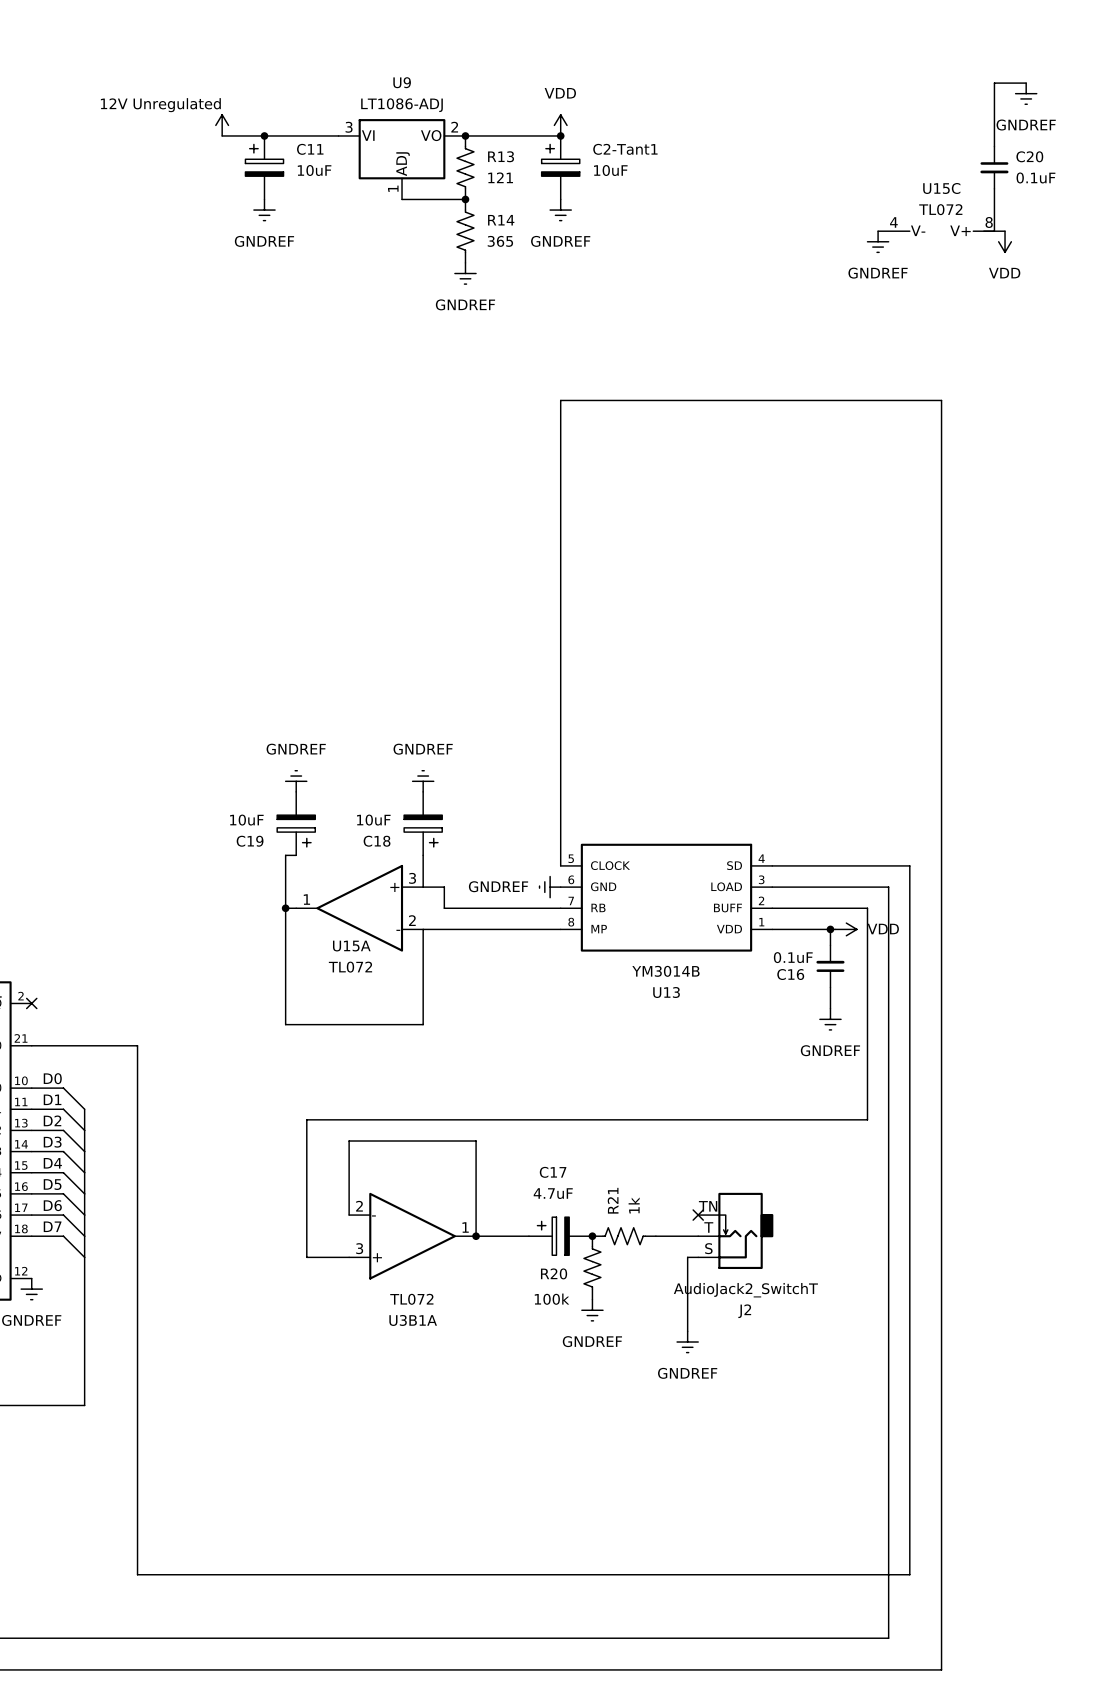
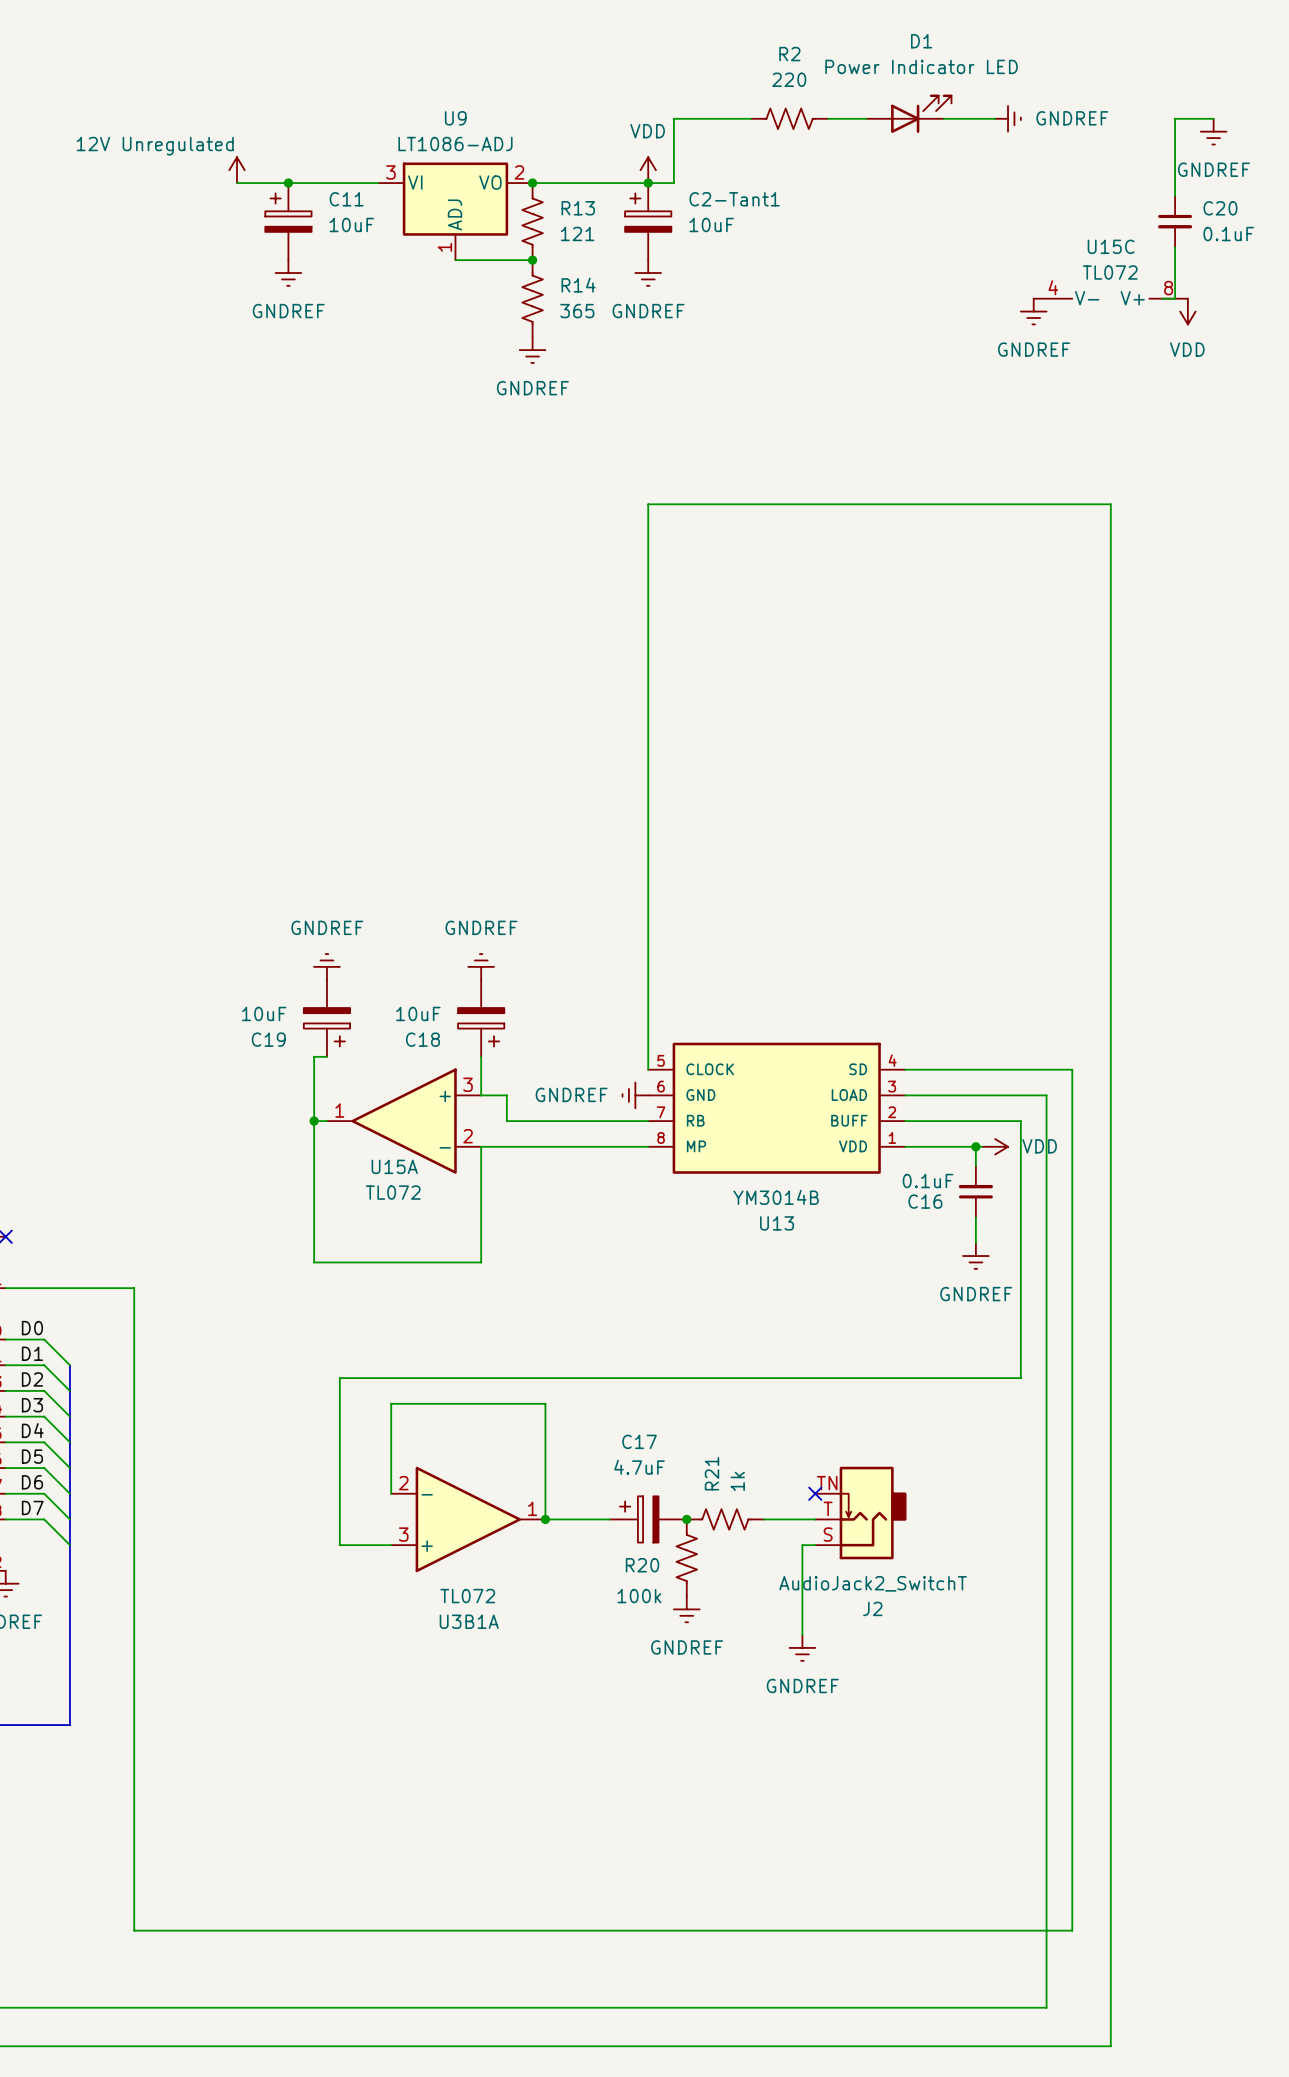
D1: none -> Power Indicator LED (909, 114)
wire: none -> (751, 118) (673, 118) (673, 183) (648, 183)
R2: none -> 220 (789, 118)
wire: none -> (828, 118) (866, 118)
wire: none -> (943, 118) (995, 118)
power symbol: none -> GNDREF (1008, 118)

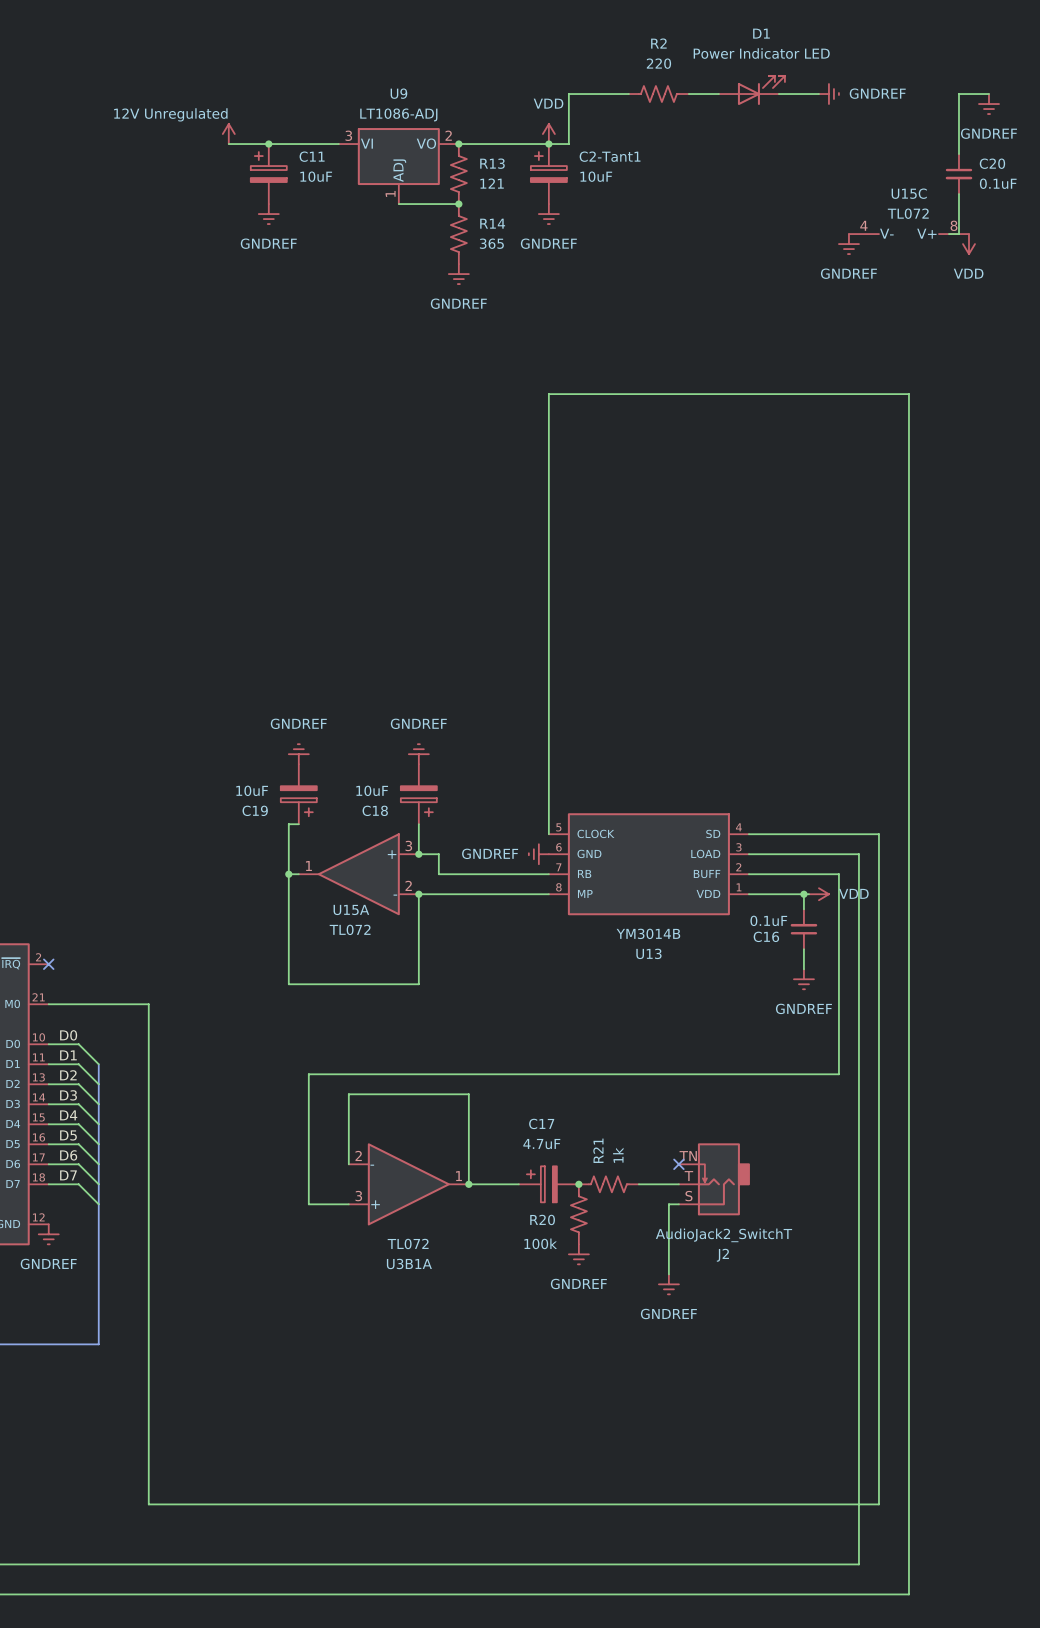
junction: none -> (418, 854)
junction: none -> (418, 894)

